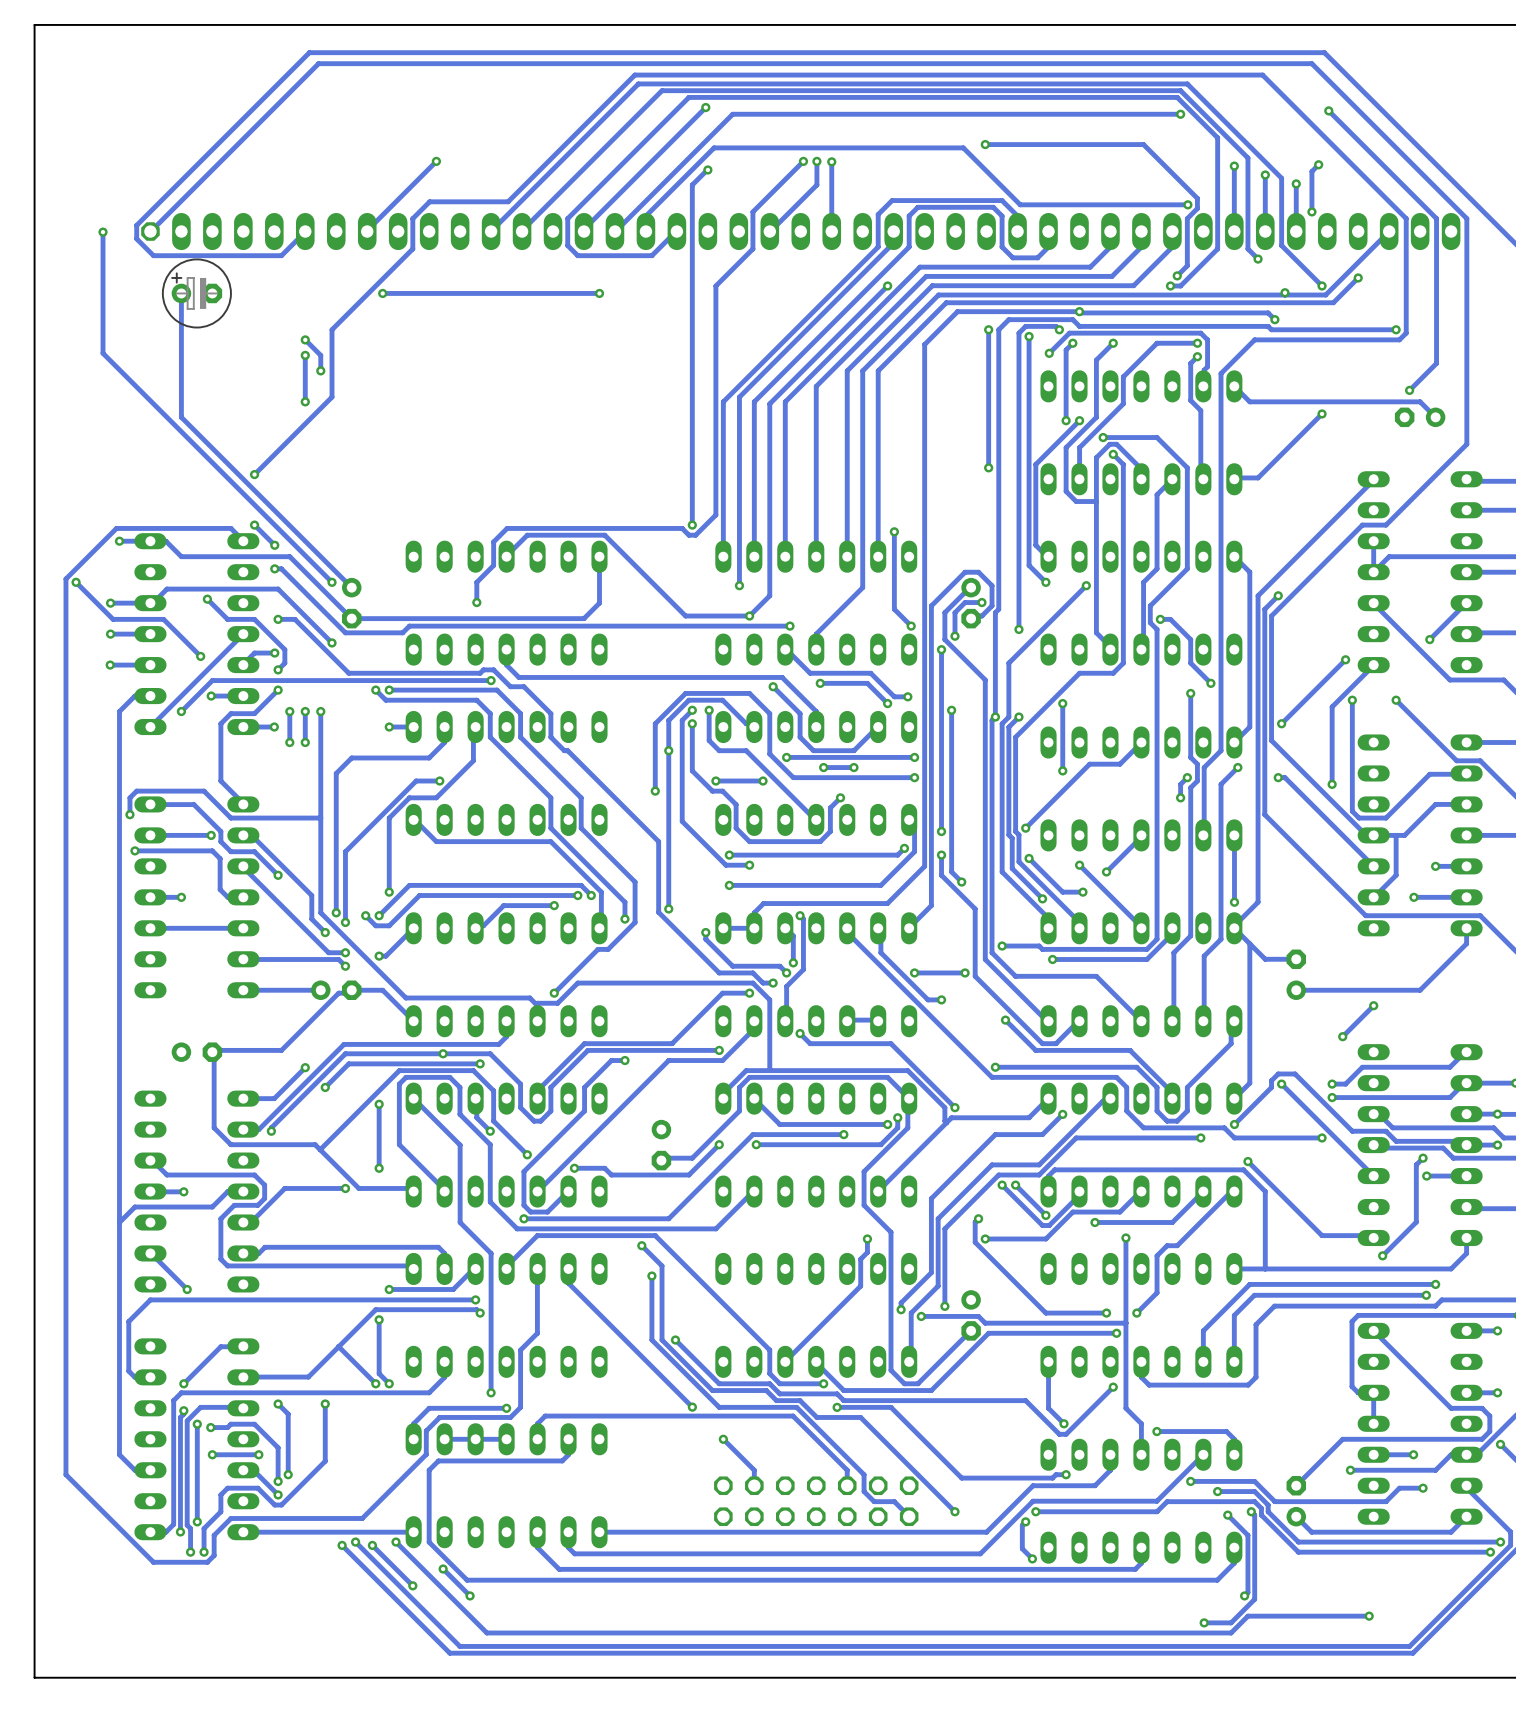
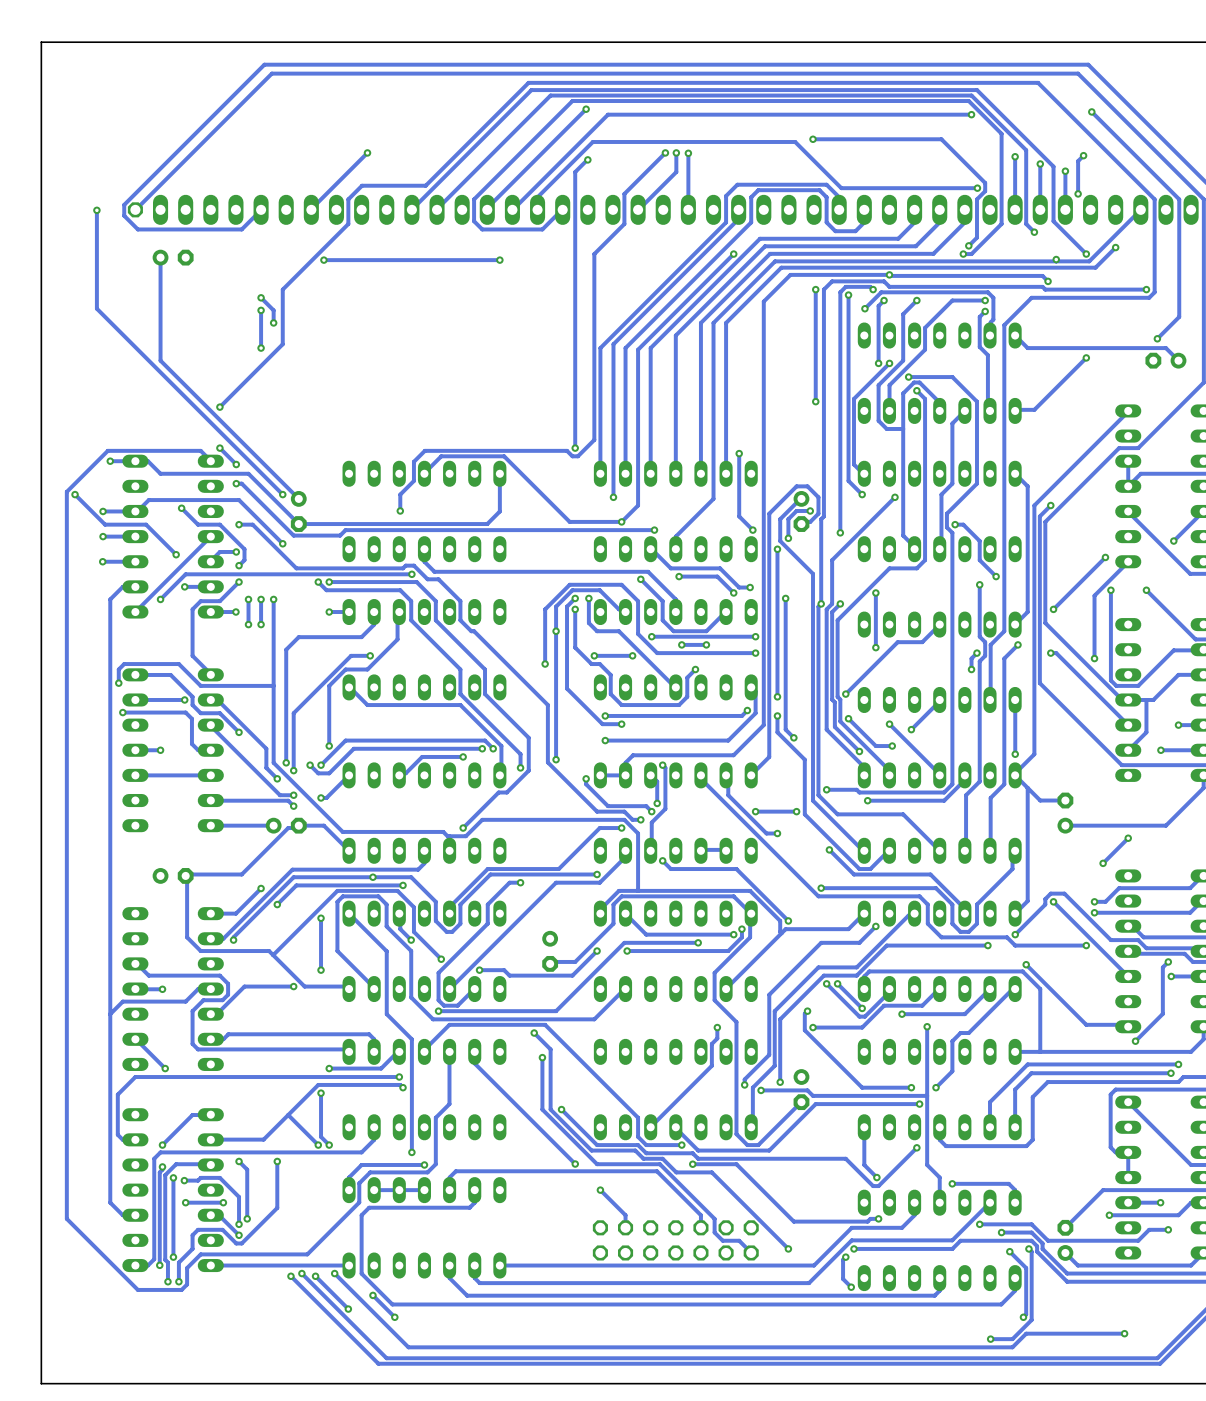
part side: bottom (196, 293) -> top (173, 257)

